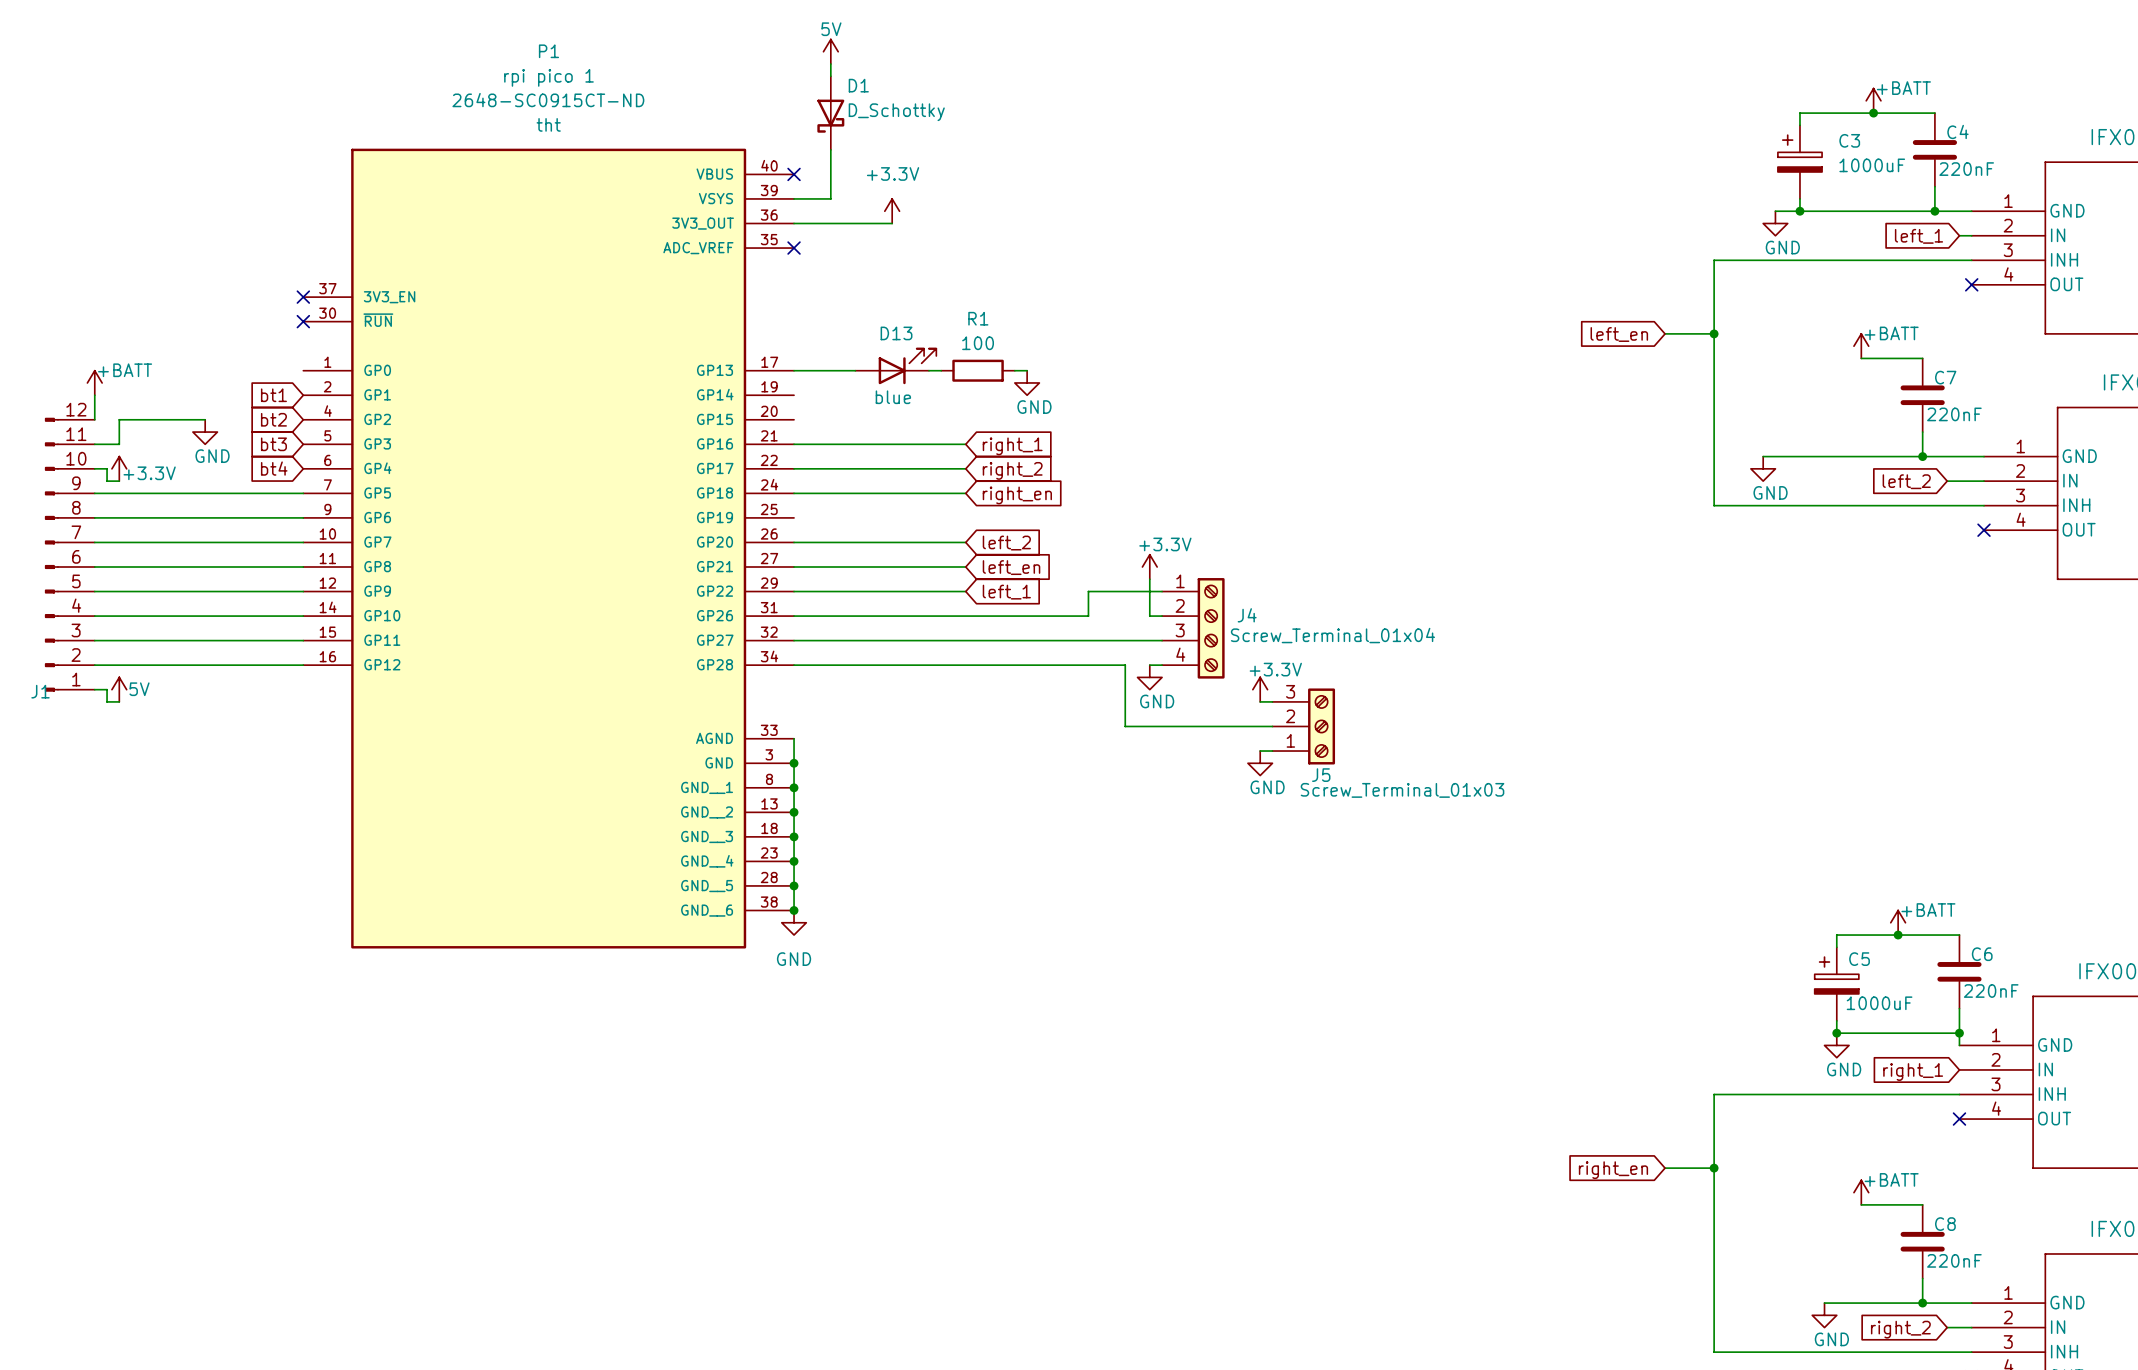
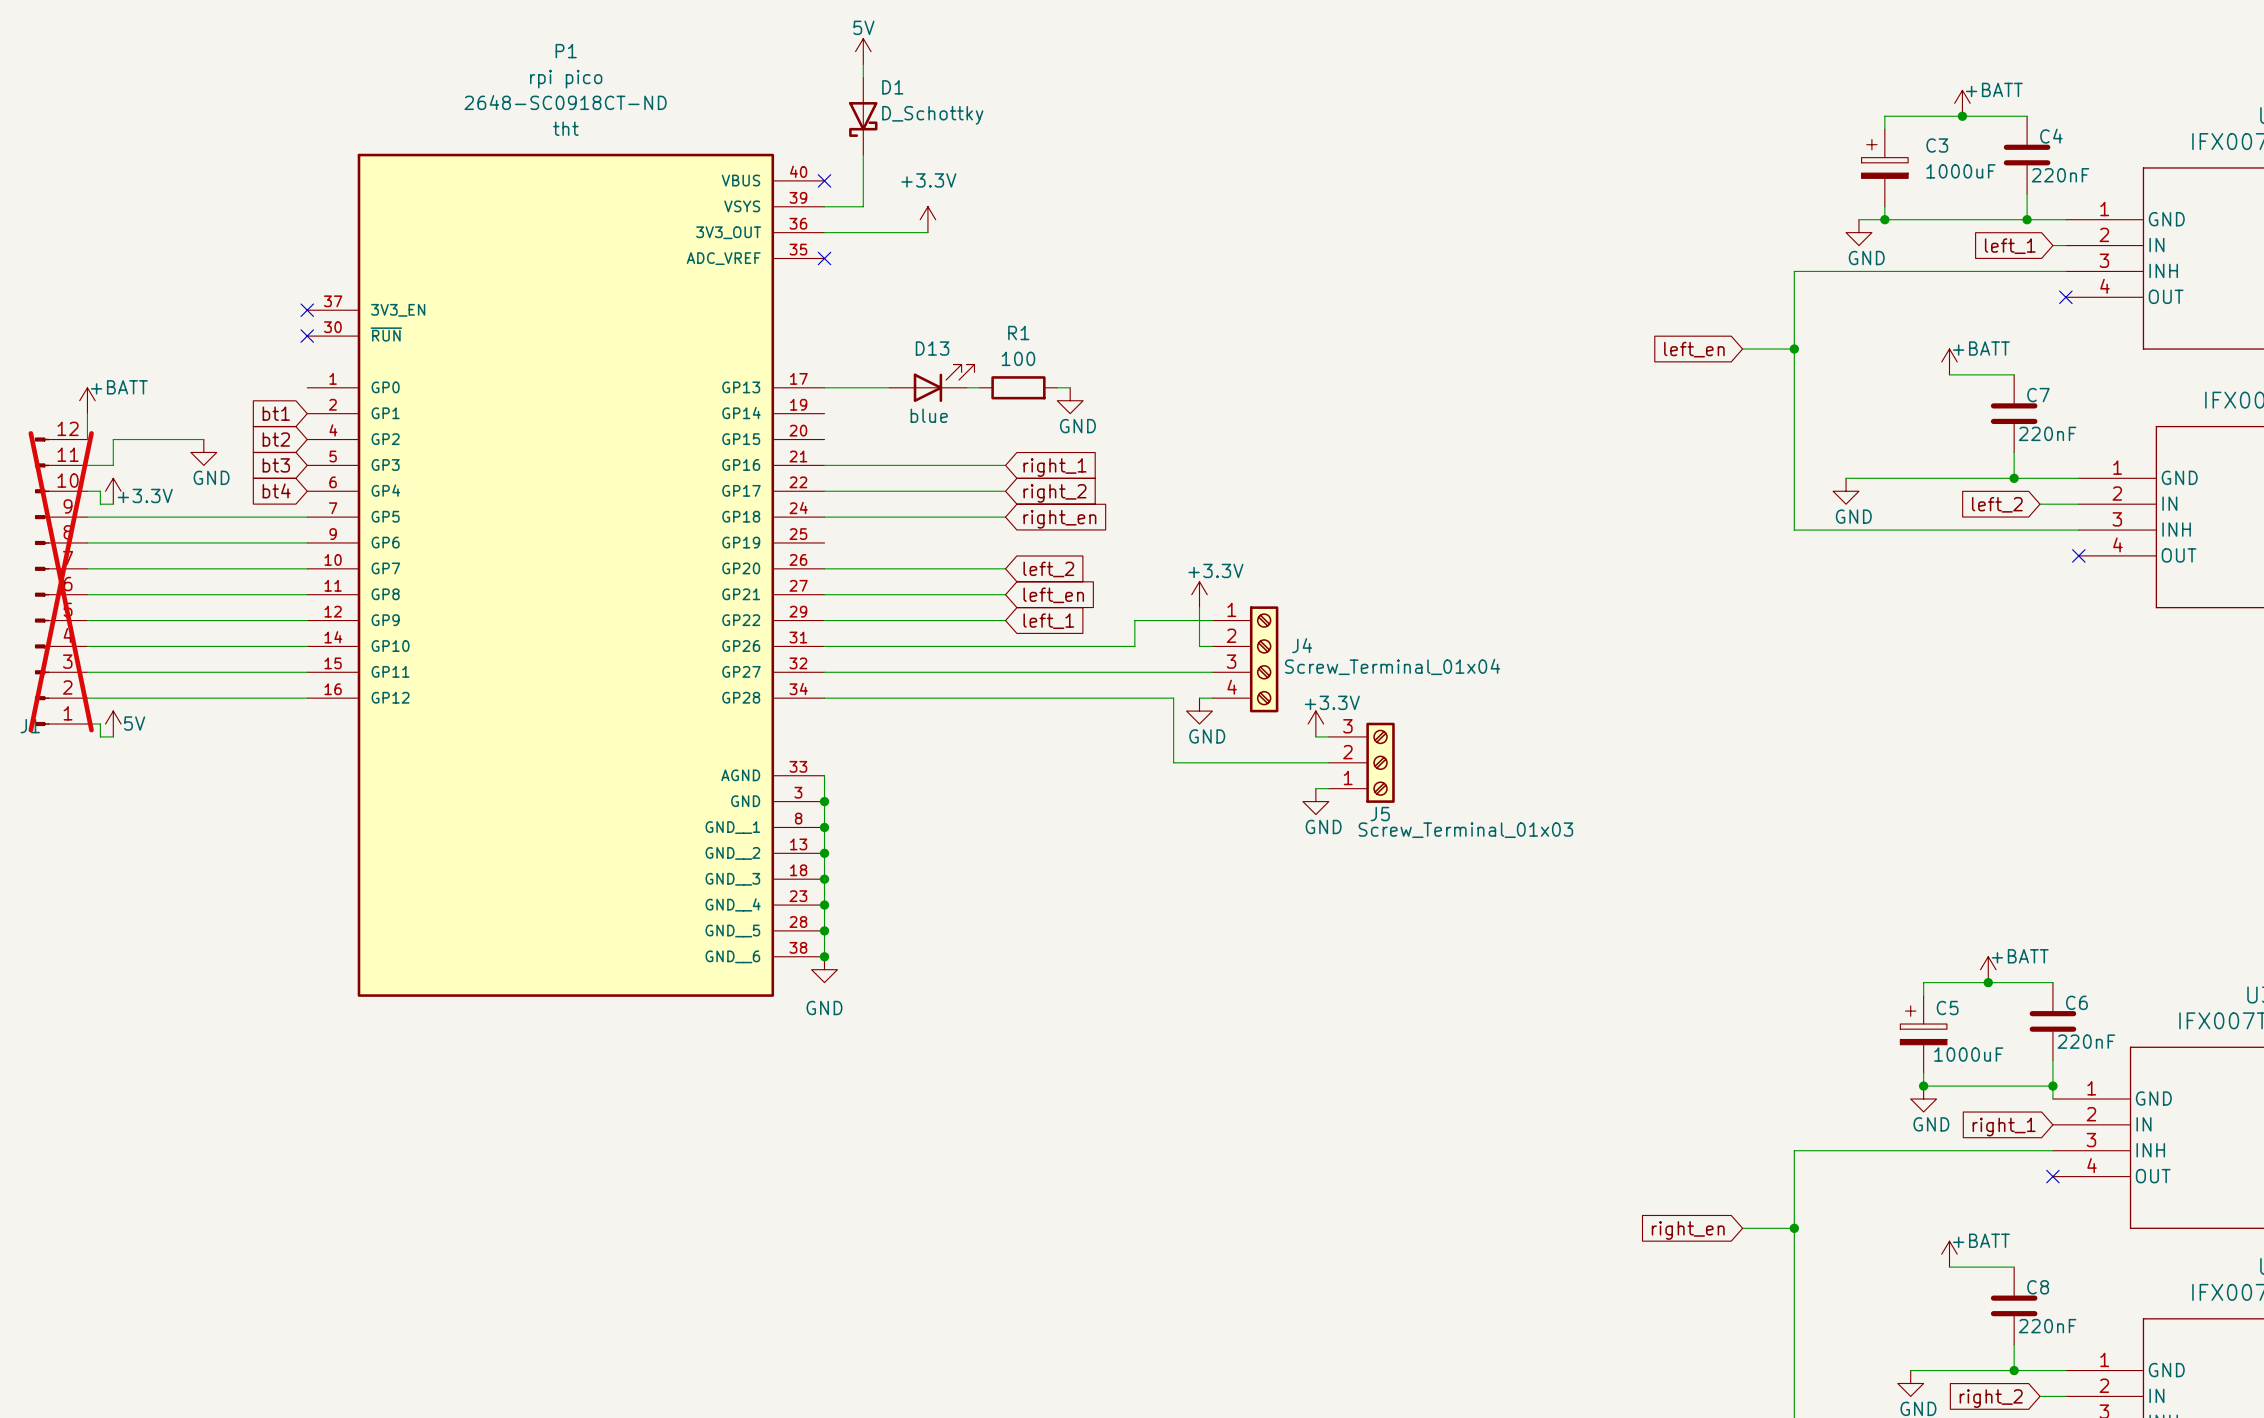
P1 value: rpi pico 1 (548, 77) -> rpi pico (566, 79)
P1 text: 2648-SC0915CT-ND (548, 100) -> 2648-SC0918CT-ND (565, 102)
J1 do-not-place cross: none -> (61, 581)

